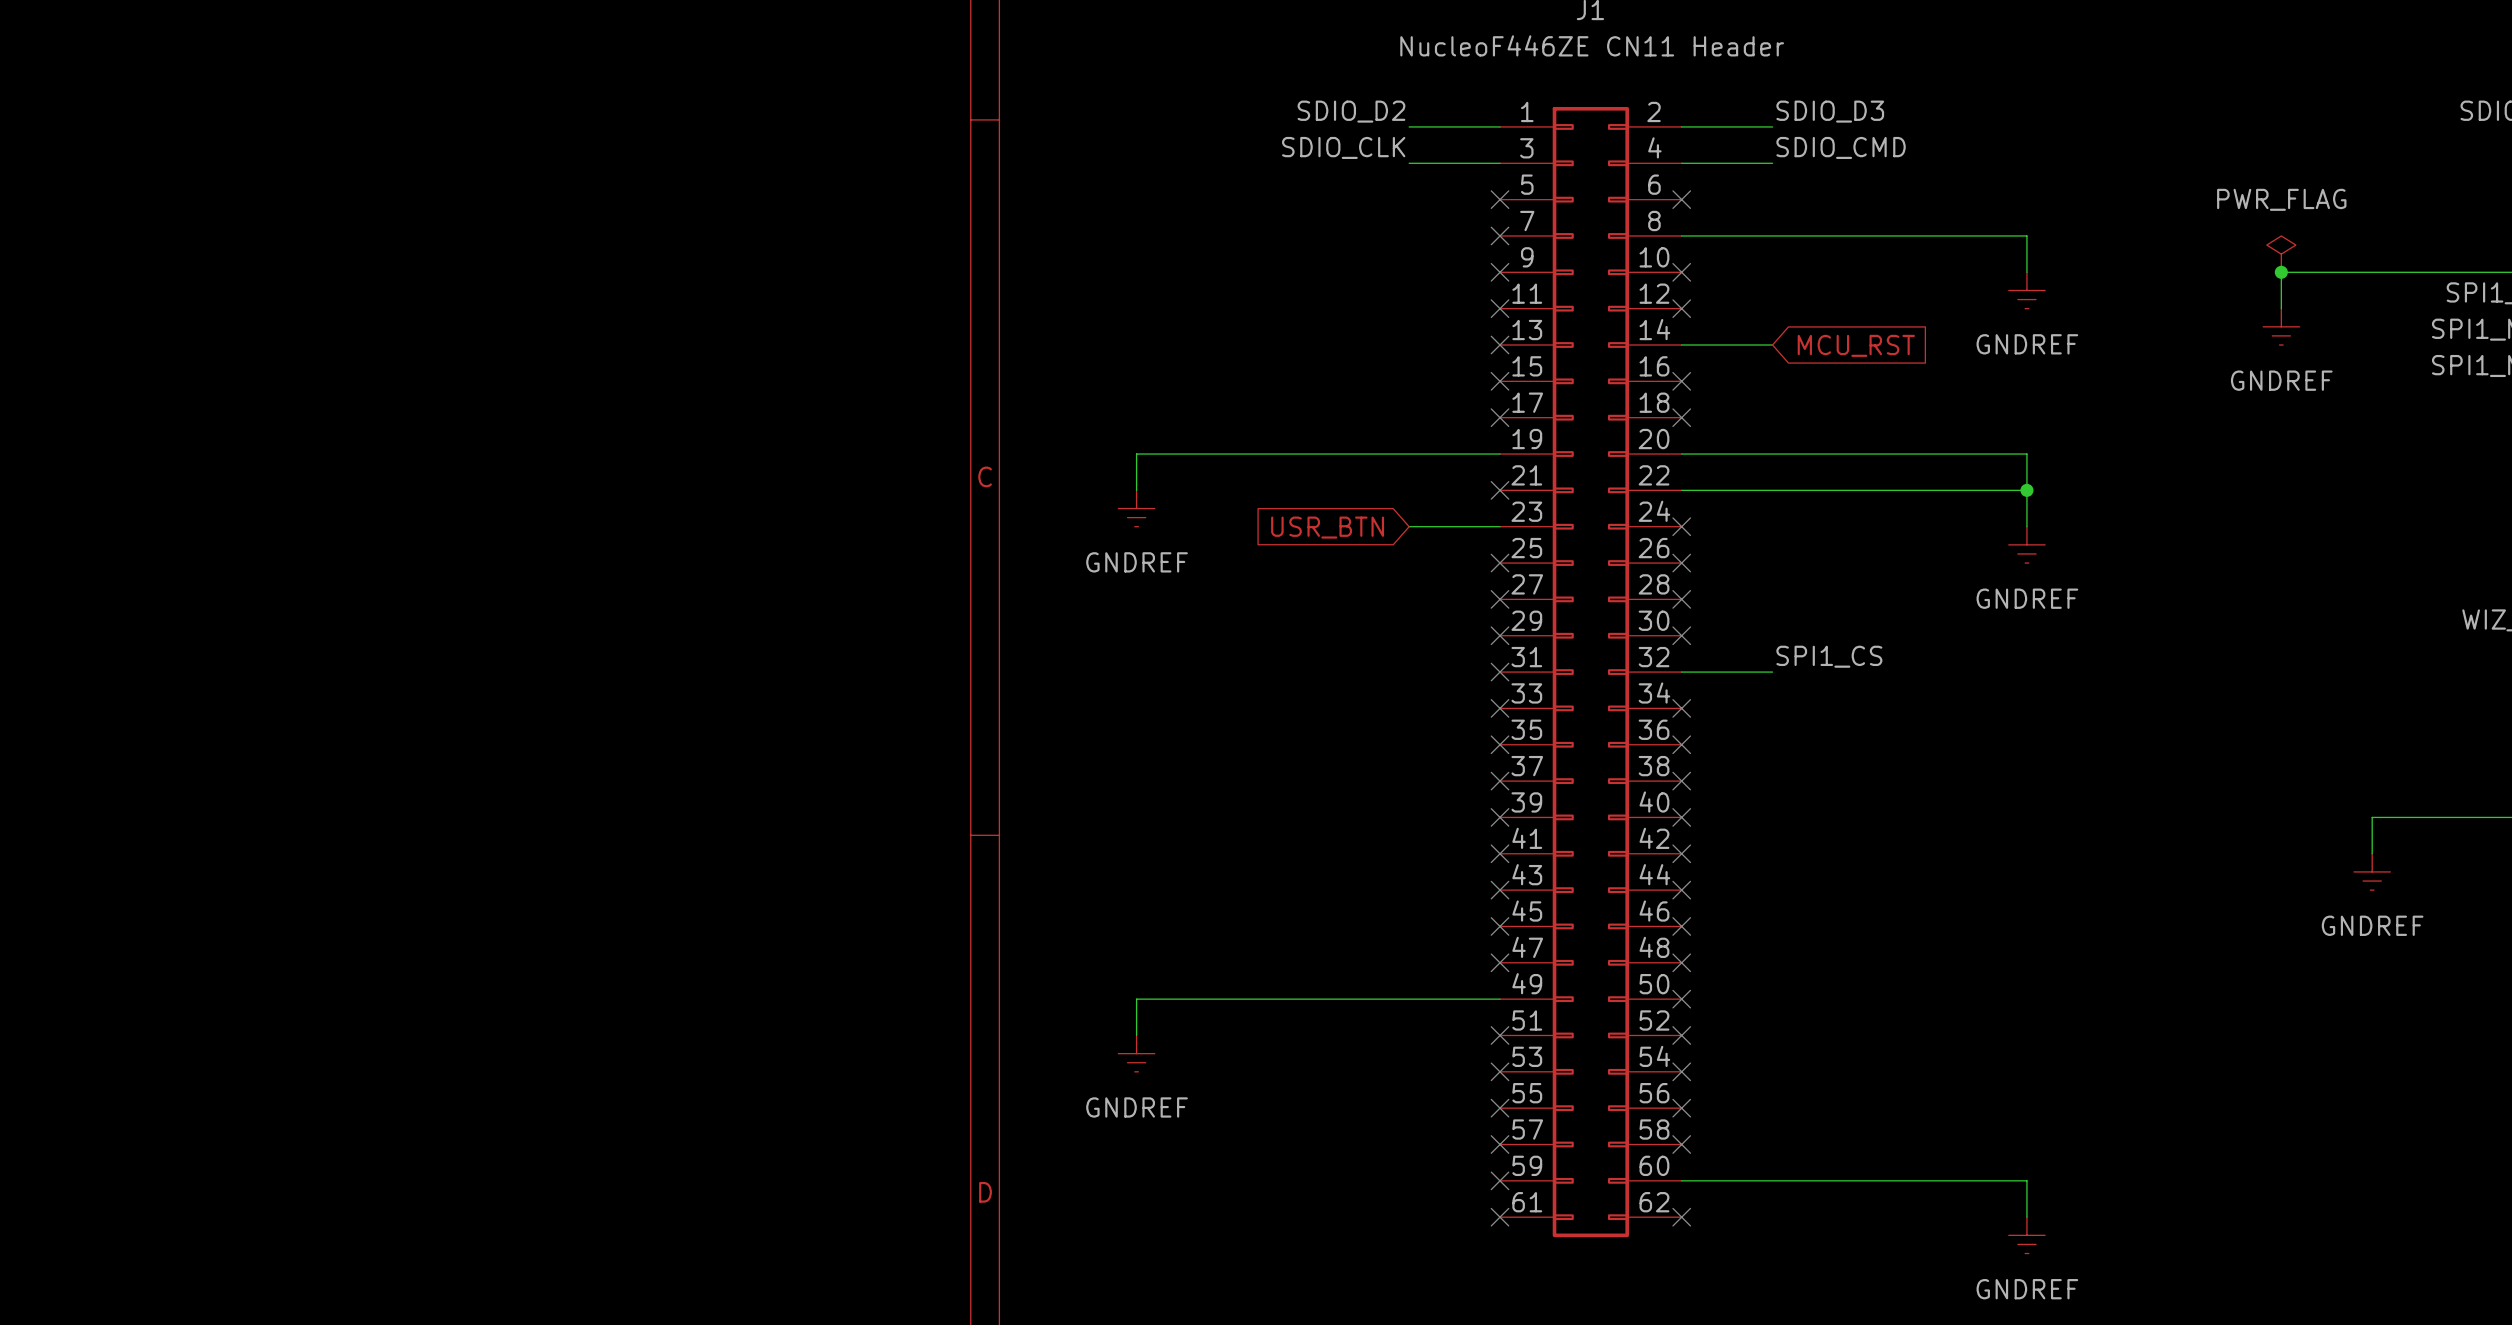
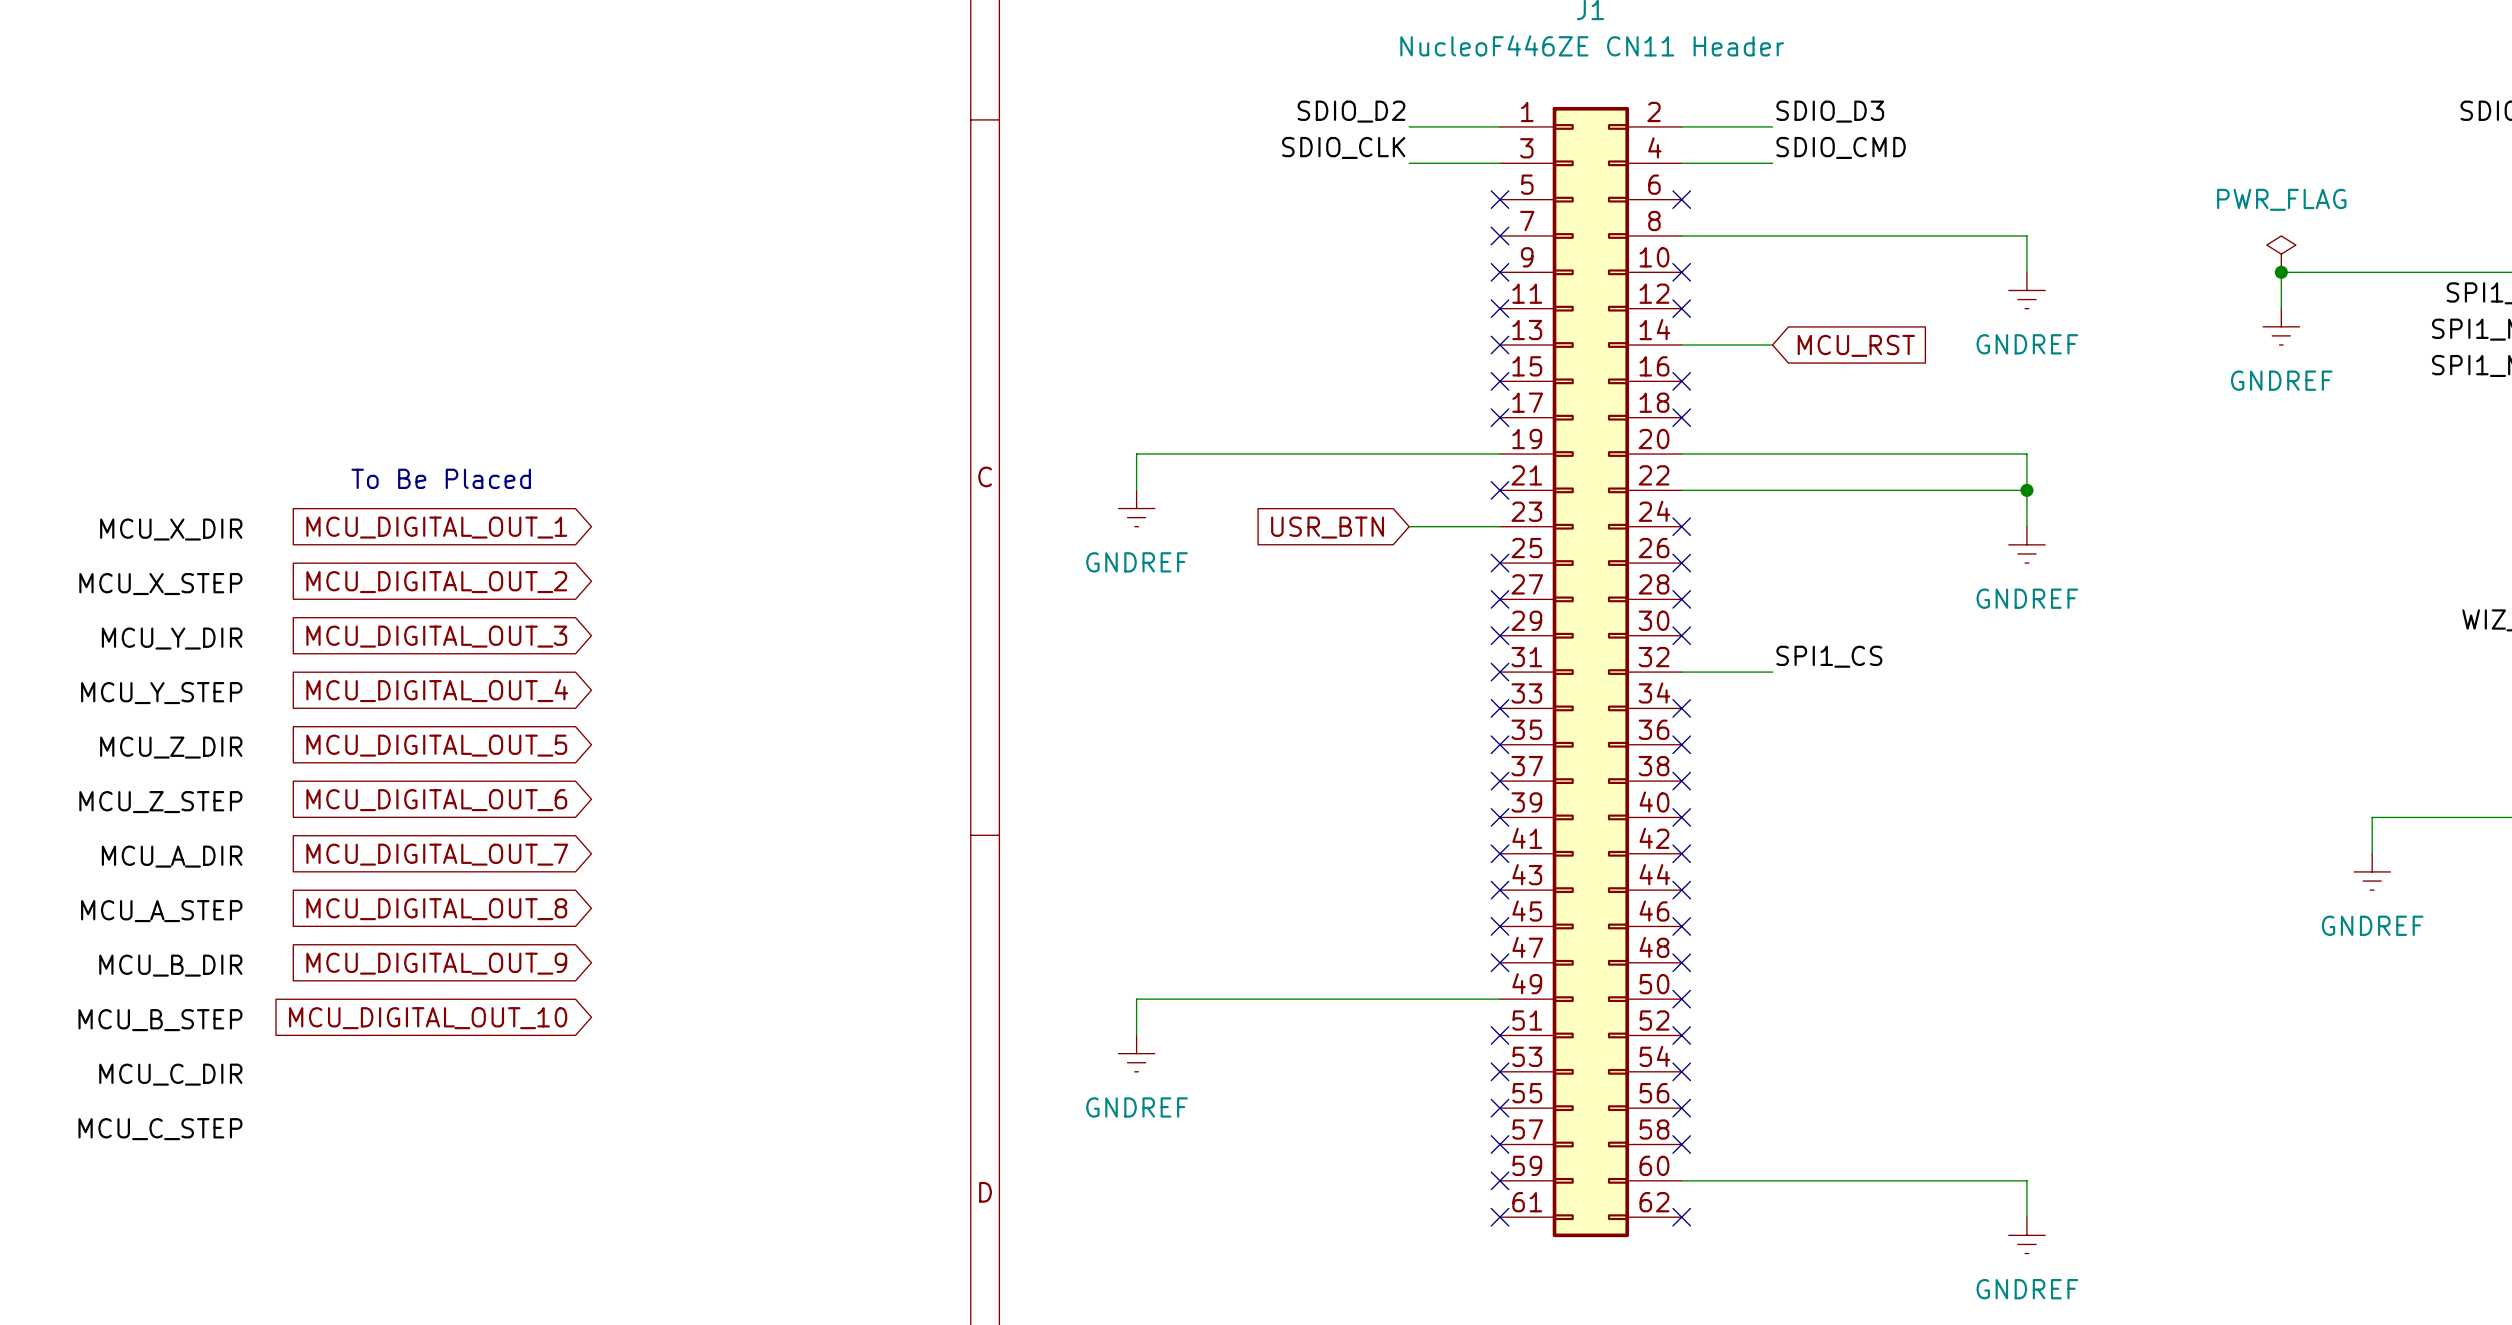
text: none -> To Be Placed (441, 478)
global label: none -> MCU_DIGITAL_OUT_1 (436, 527)
label: none -> MCU_X_DIR (171, 529)
global label: none -> MCU_DIGITAL_OUT_2 (436, 582)
label: none -> MCU_X_STEP (160, 584)
global label: none -> MCU_DIGITAL_OUT_3 (436, 636)
label: none -> MCU_Y_DIR (172, 638)
global label: none -> MCU_DIGITAL_OUT_4 (437, 690)
label: none -> MCU_Y_STEP (161, 693)
global label: none -> MCU_DIGITAL_OUT_5 (436, 745)
label: none -> MCU_Z_DIR (171, 747)
global label: none -> MCU_DIGITAL_OUT_6 (436, 800)
label: none -> MCU_Z_STEP (160, 802)
global label: none -> MCU_DIGITAL_OUT_7 (437, 854)
label: none -> MCU_A_DIR (172, 856)
global label: none -> MCU_DIGITAL_OUT_8 (436, 909)
label: none -> MCU_A_STEP (161, 911)
global label: none -> MCU_DIGITAL_OUT_9 (436, 963)
label: none -> MCU_B_DIR (170, 965)
global label: none -> MCU_DIGITAL_OUT_10 (428, 1018)
label: none -> MCU_B_STEP (160, 1020)
label: none -> MCU_C_DIR (170, 1074)
label: none -> MCU_C_STEP (160, 1129)

